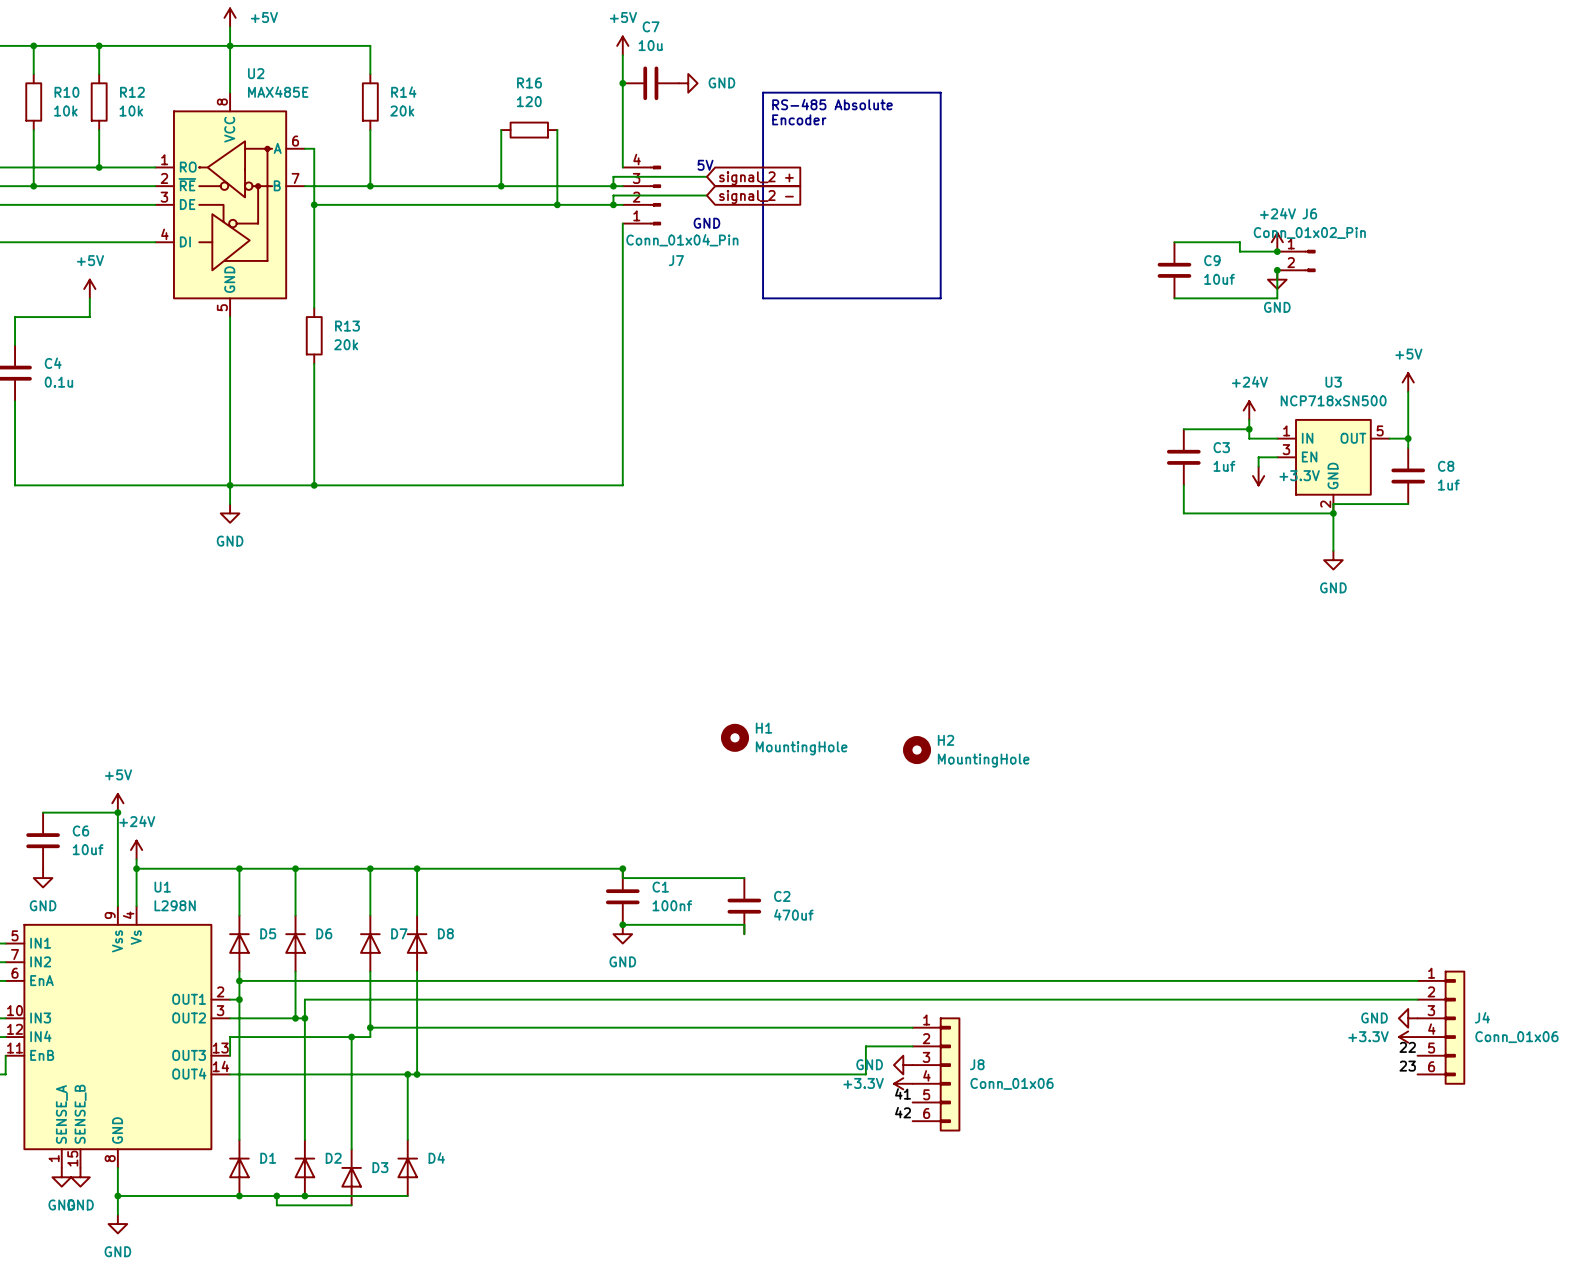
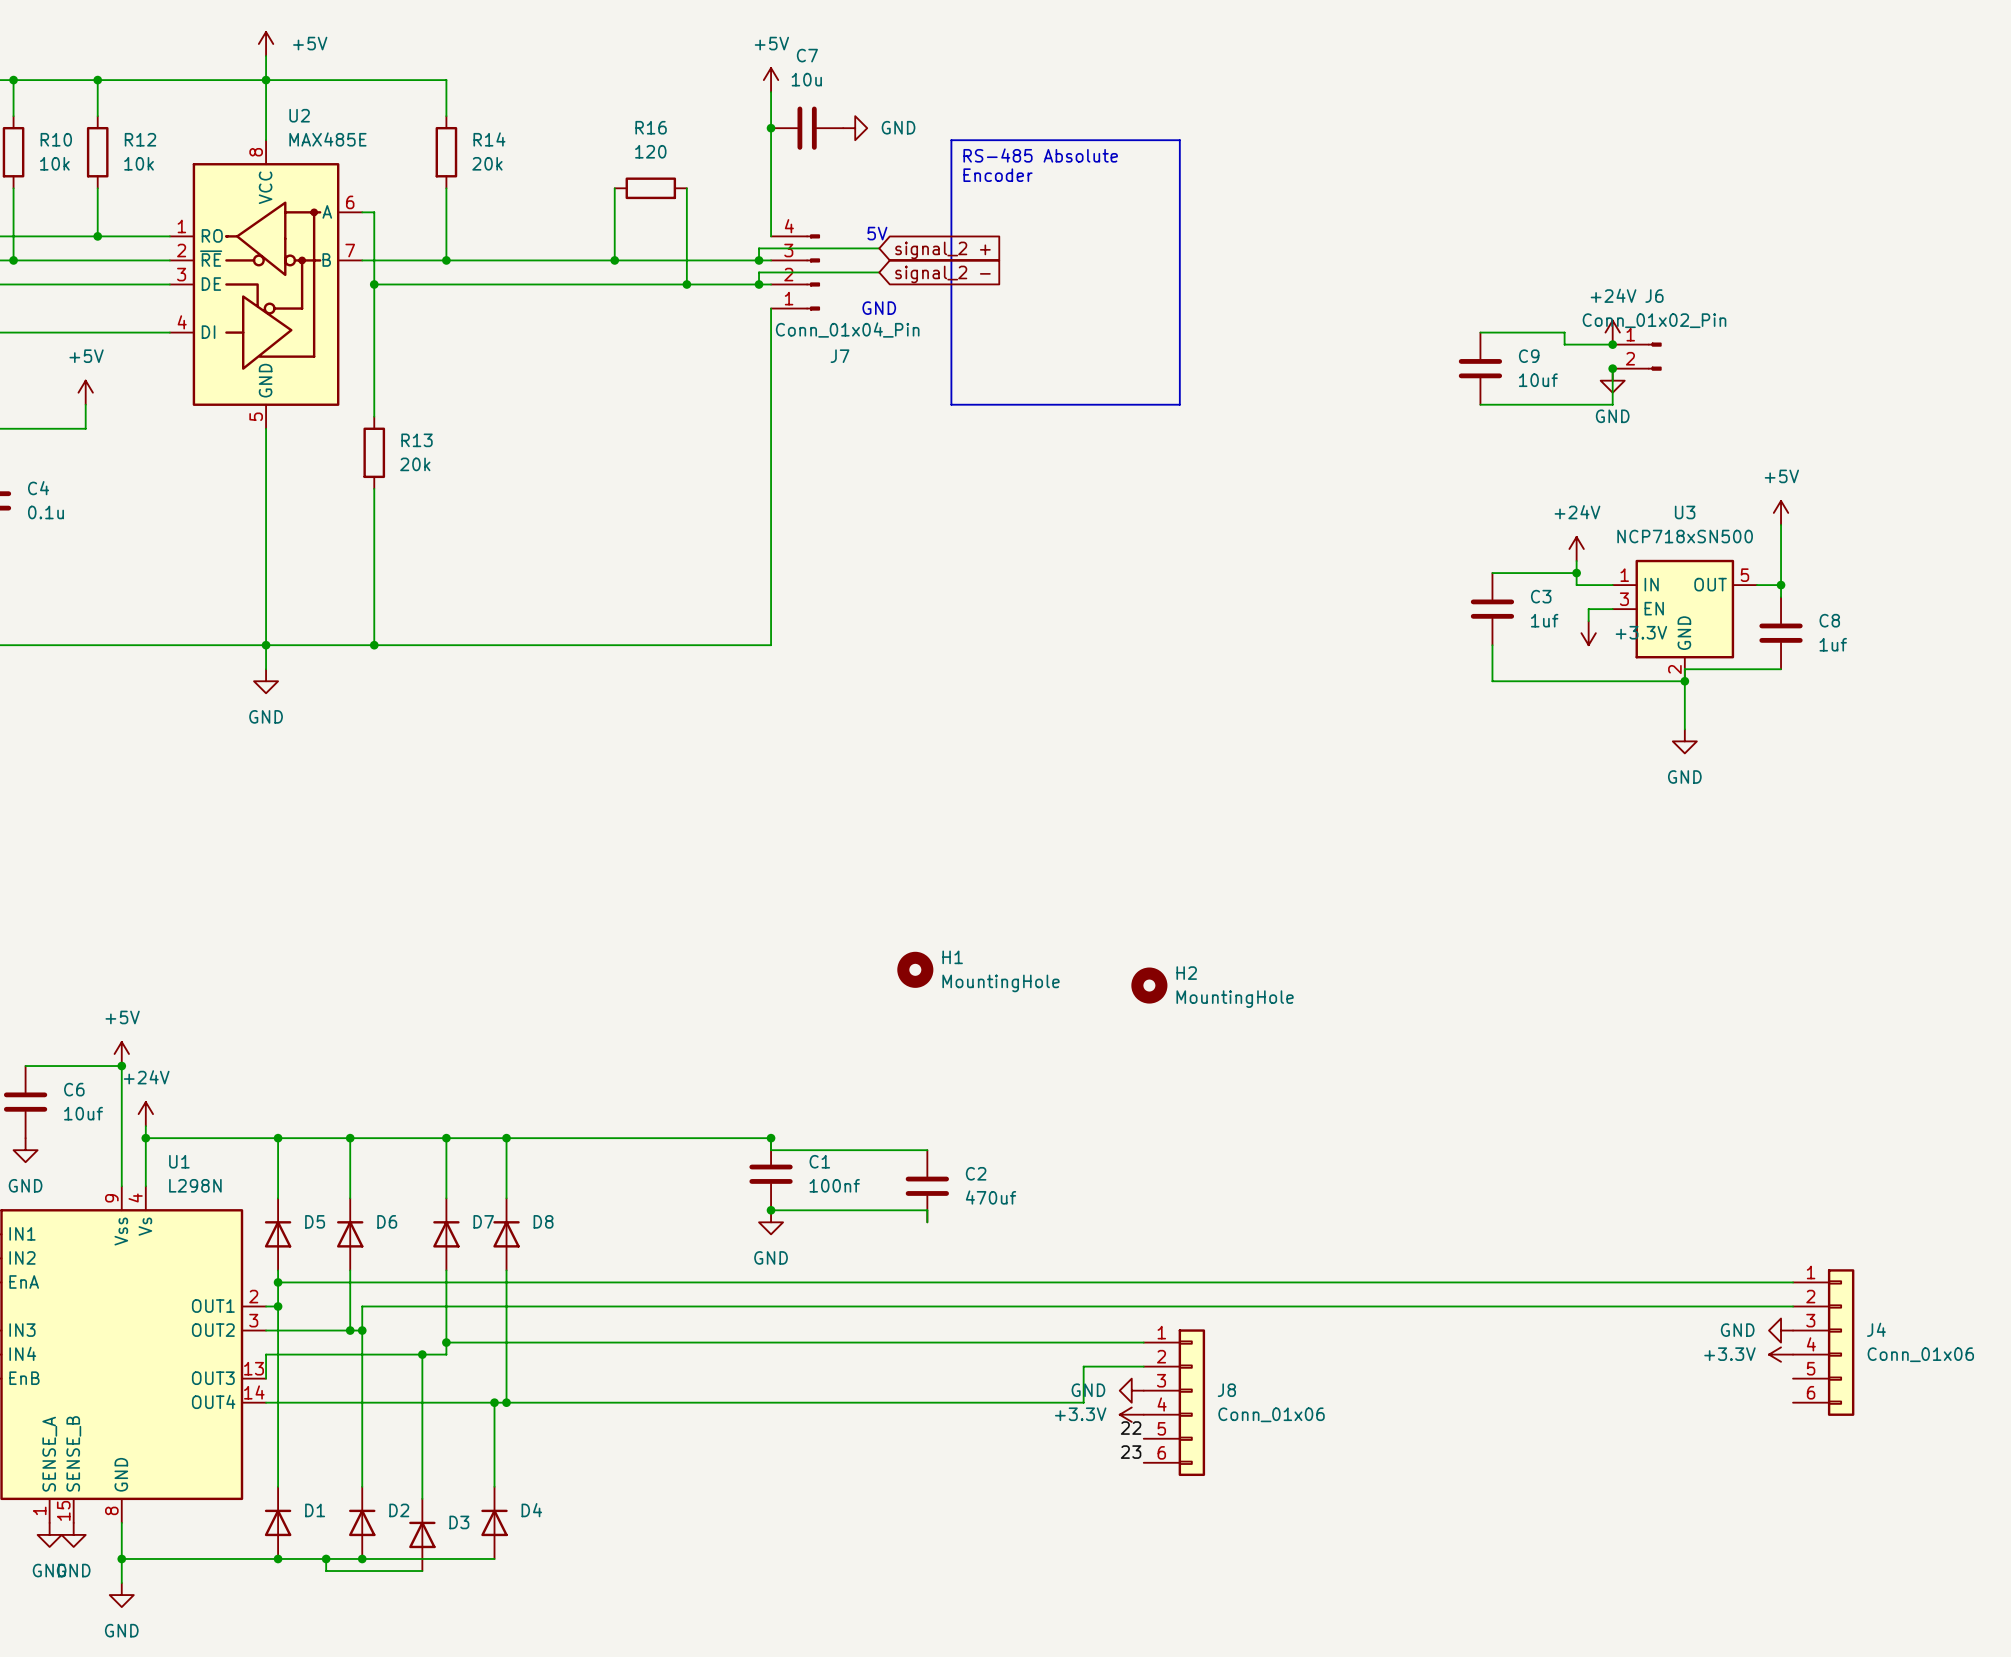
label: 22 (1407, 1047) -> none
label: 23 (1407, 1066) -> none
label: 41 (903, 1093) -> 22 (1131, 1428)
label: 42 (903, 1112) -> 23 (1131, 1452)

